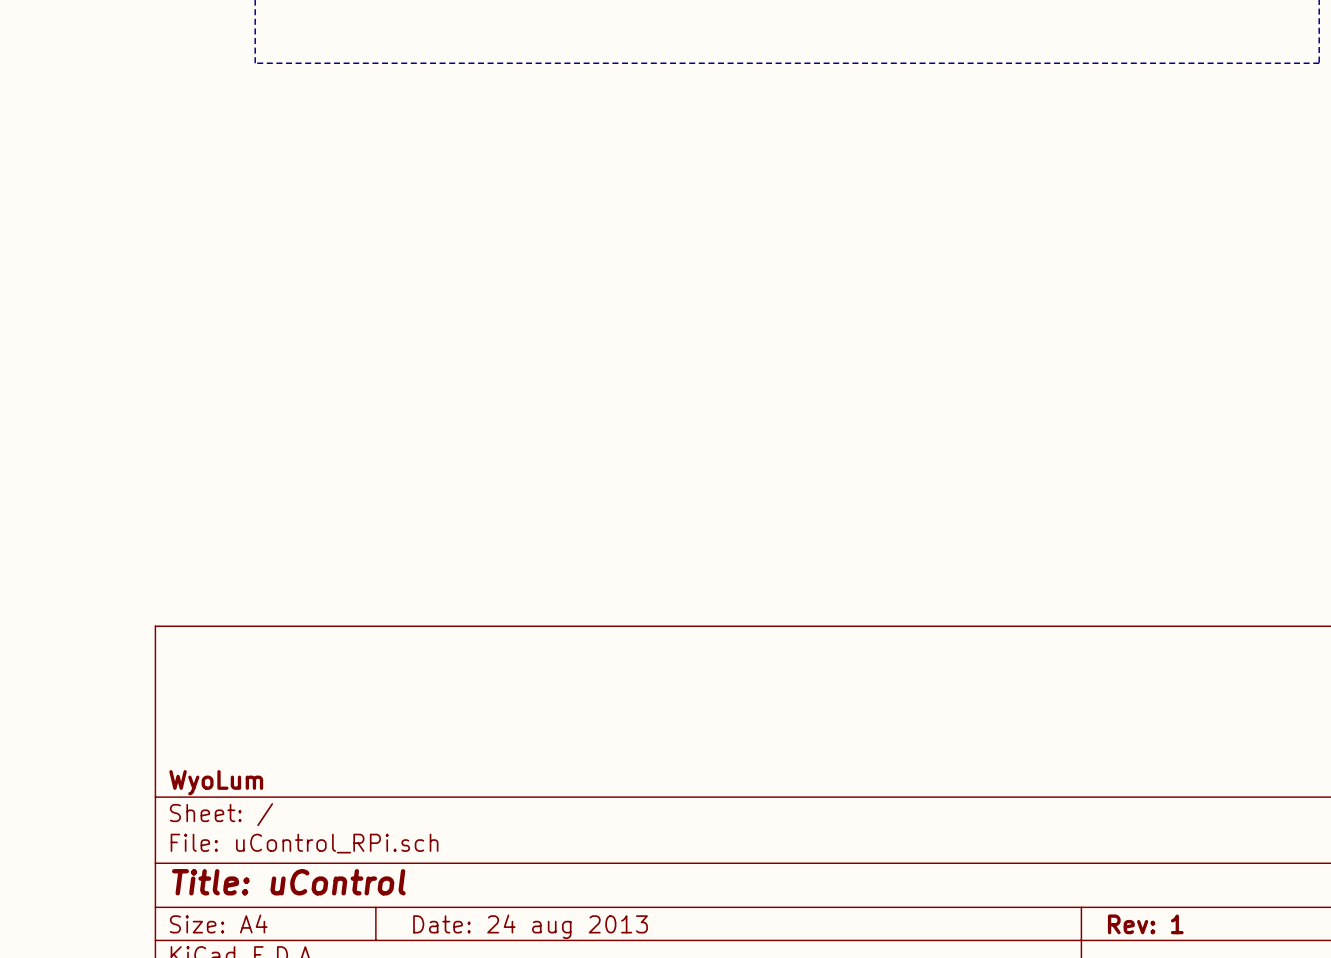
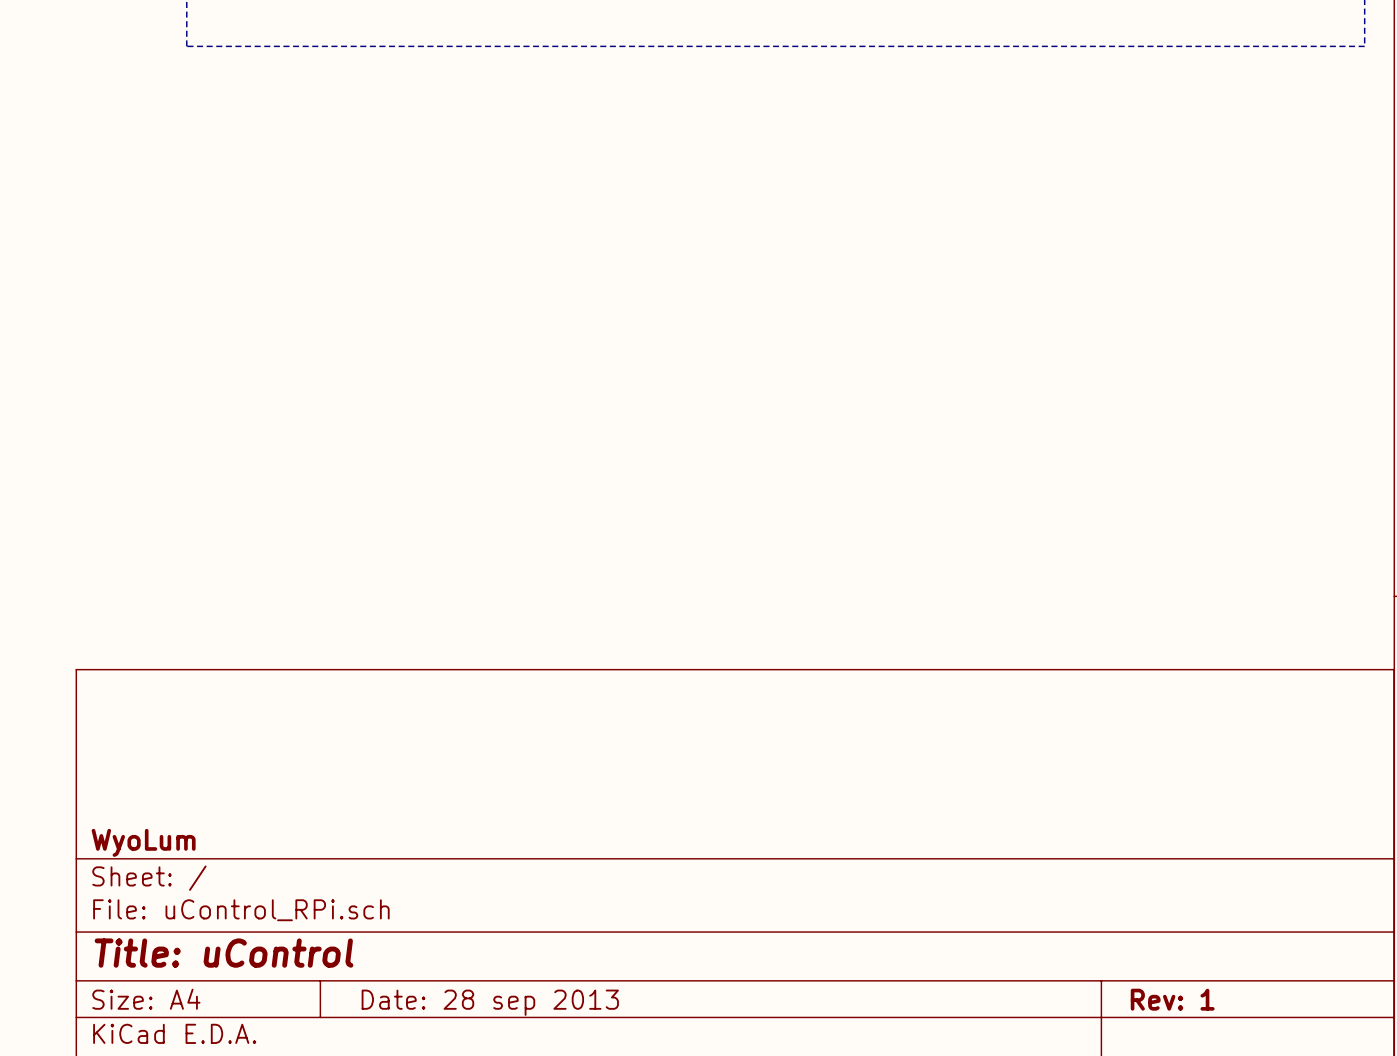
title block: Date: 24 aug 2013 (530, 926) -> Date: 28 sep 2013 (490, 1002)

